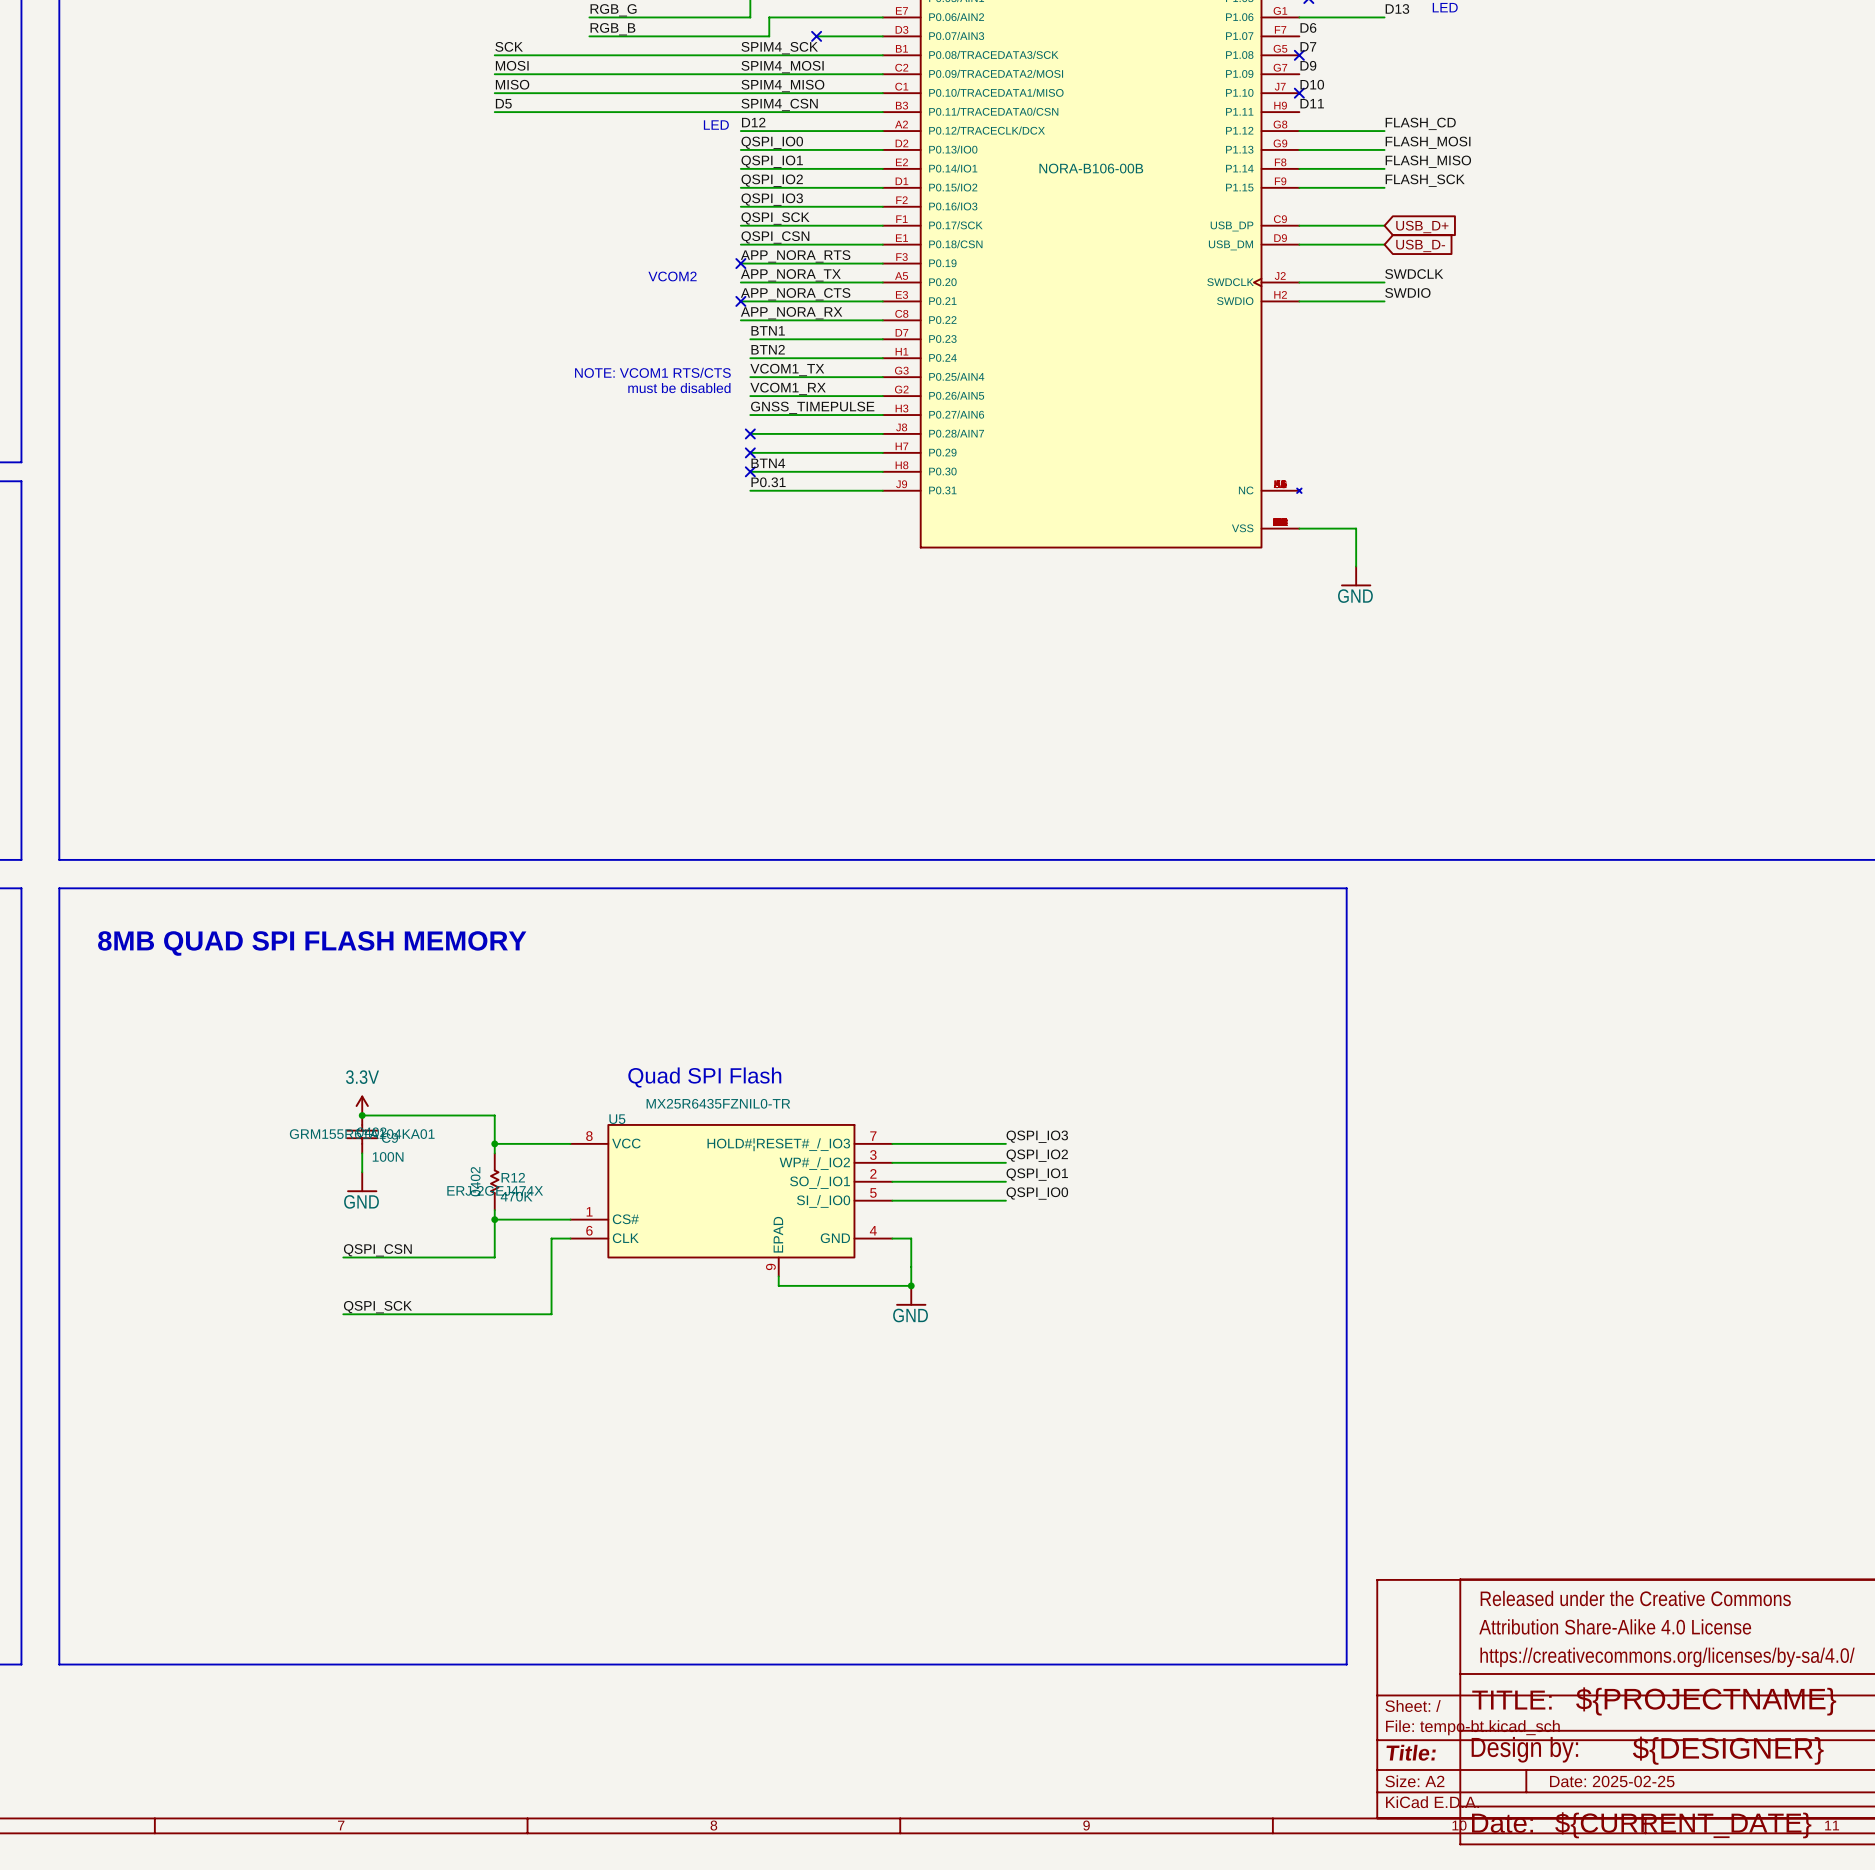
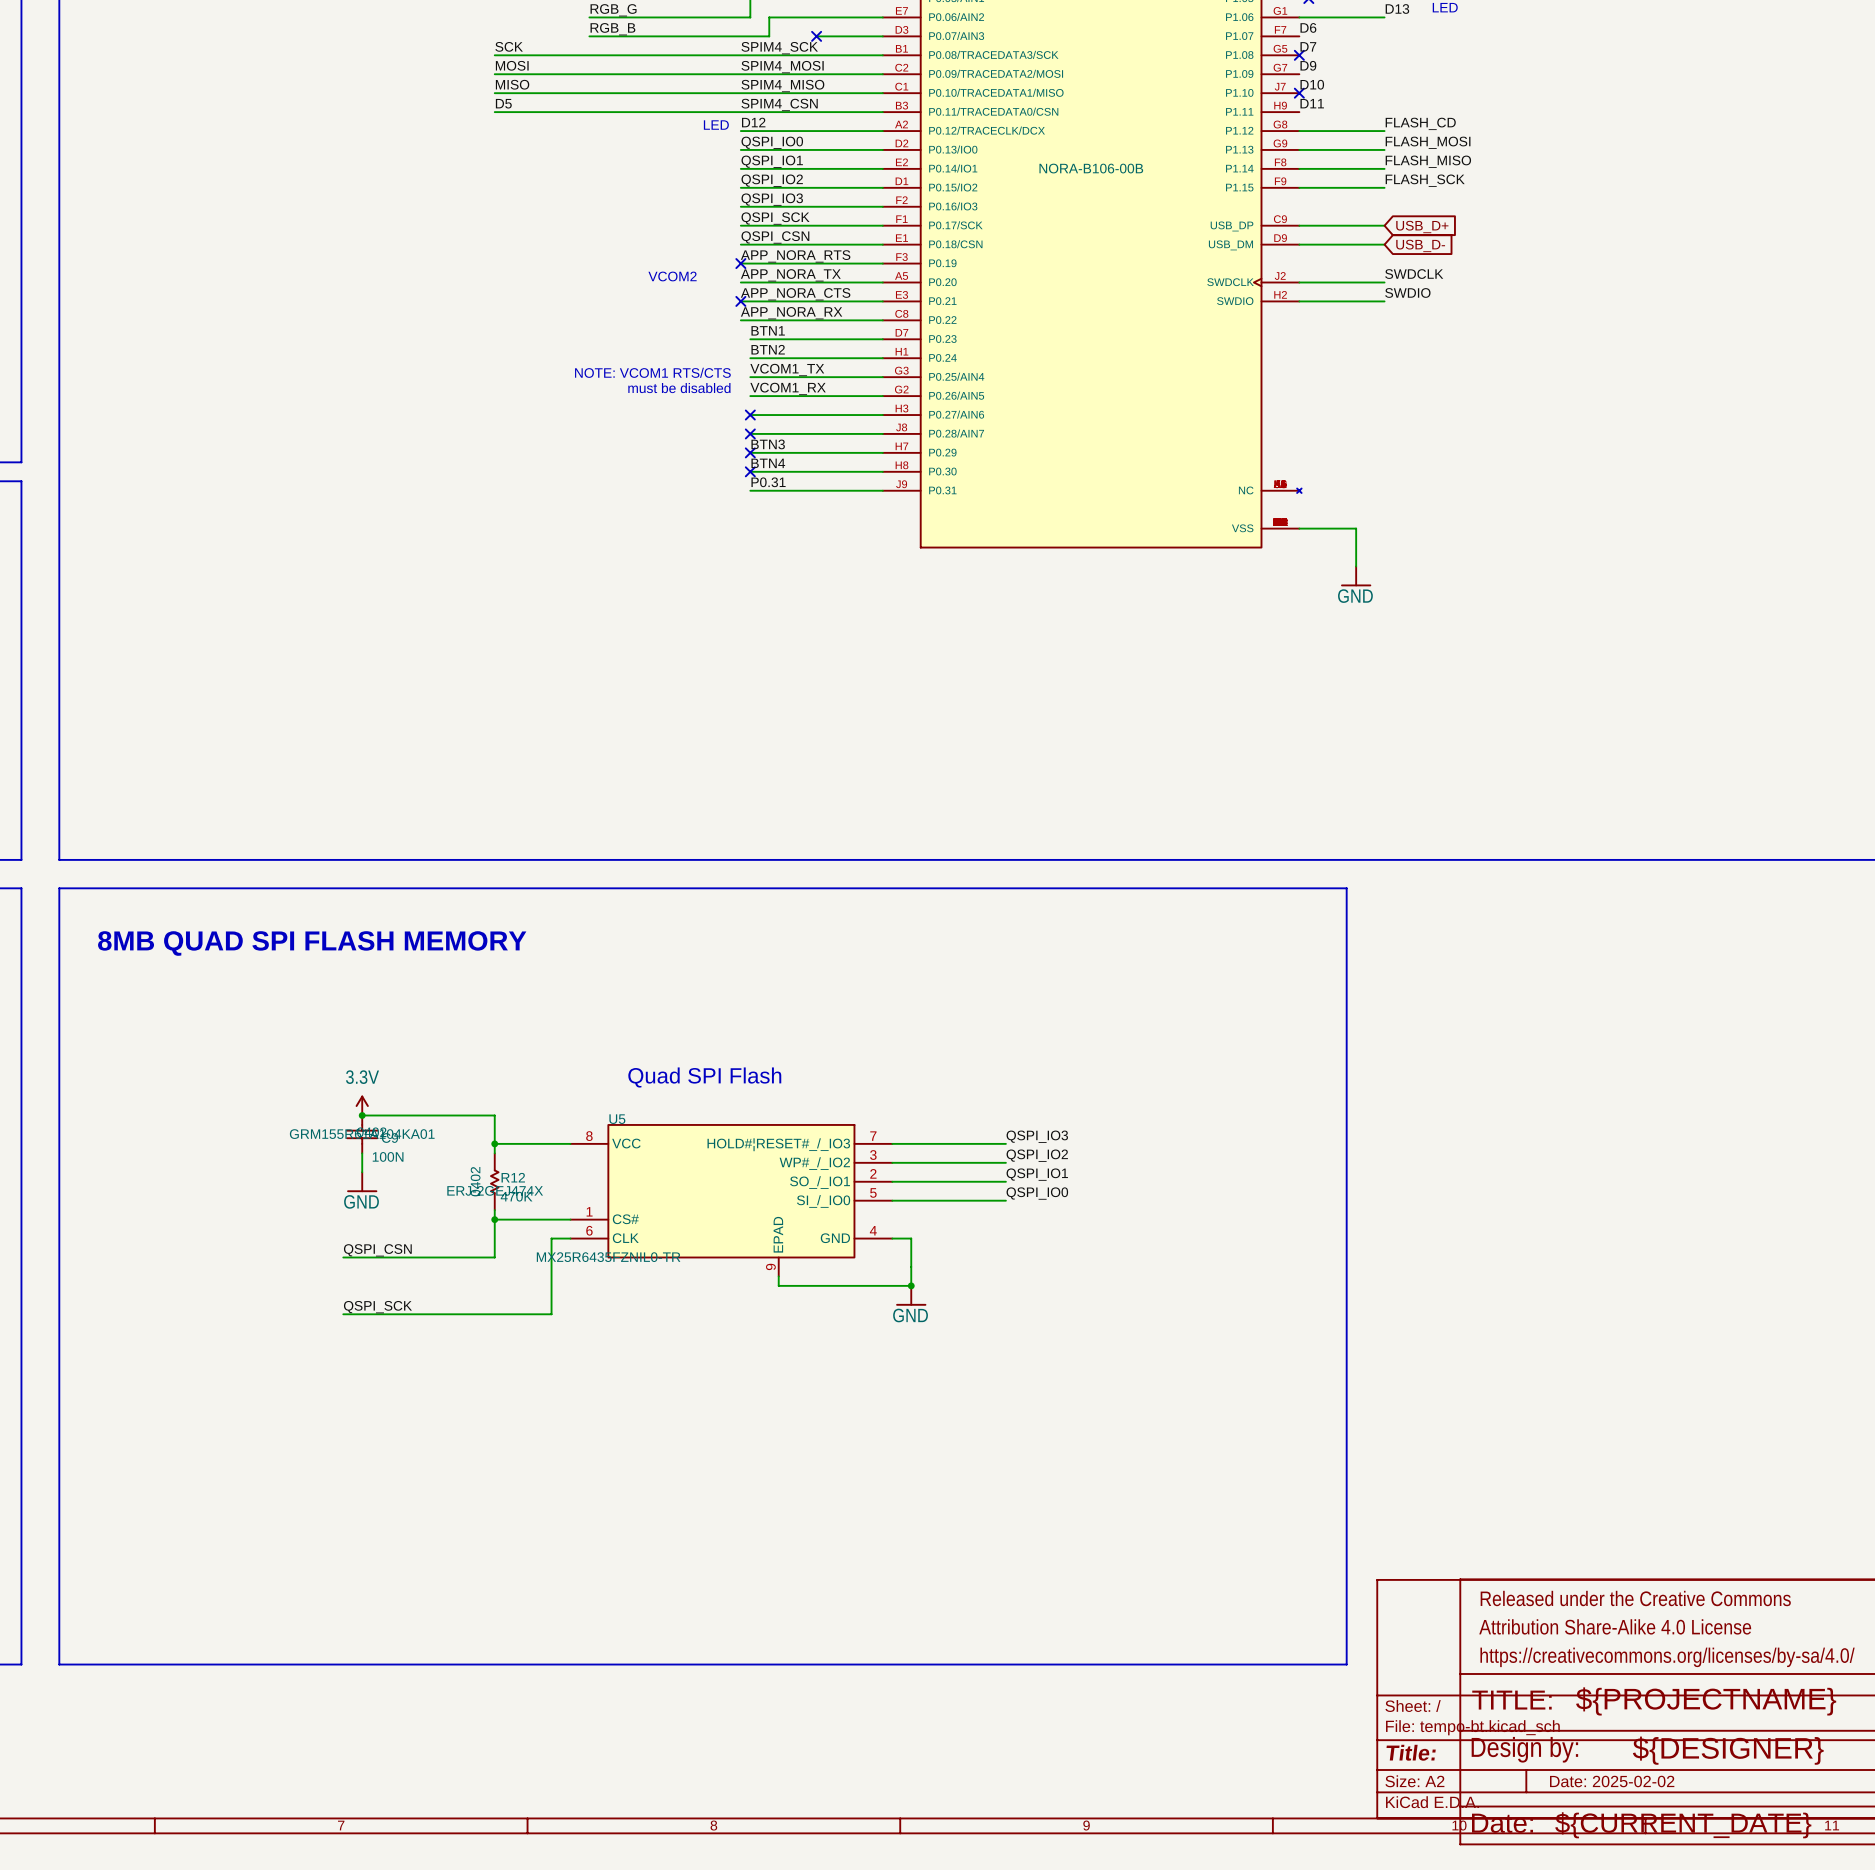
label: GNSS_TIMEPULSE (812, 407) -> none
no-connect mark: none -> (750, 415)
label: none -> BTN3 (768, 444)
U5 text position: MX25R6435FZNIL0-TR (718, 1103) -> MX25R6435FZNIL0-TR (608, 1257)
title block: Date: 2025-02-25 (1612, 1781) -> Date: 2025-02-02 (1612, 1781)

